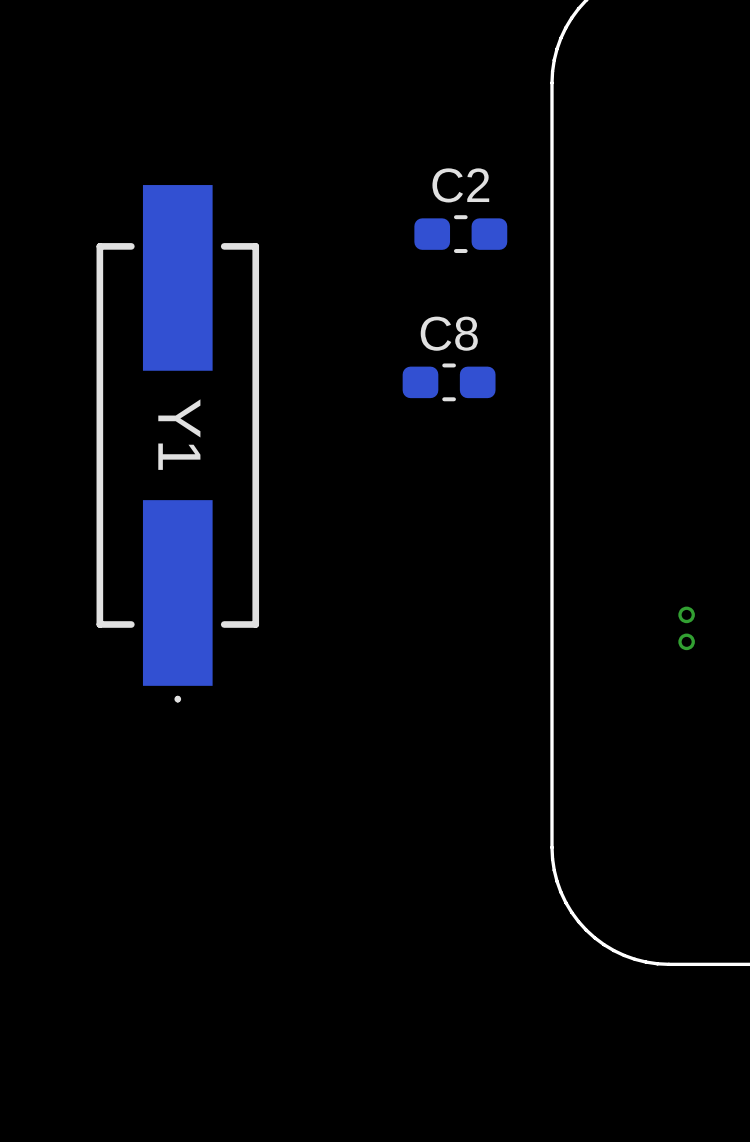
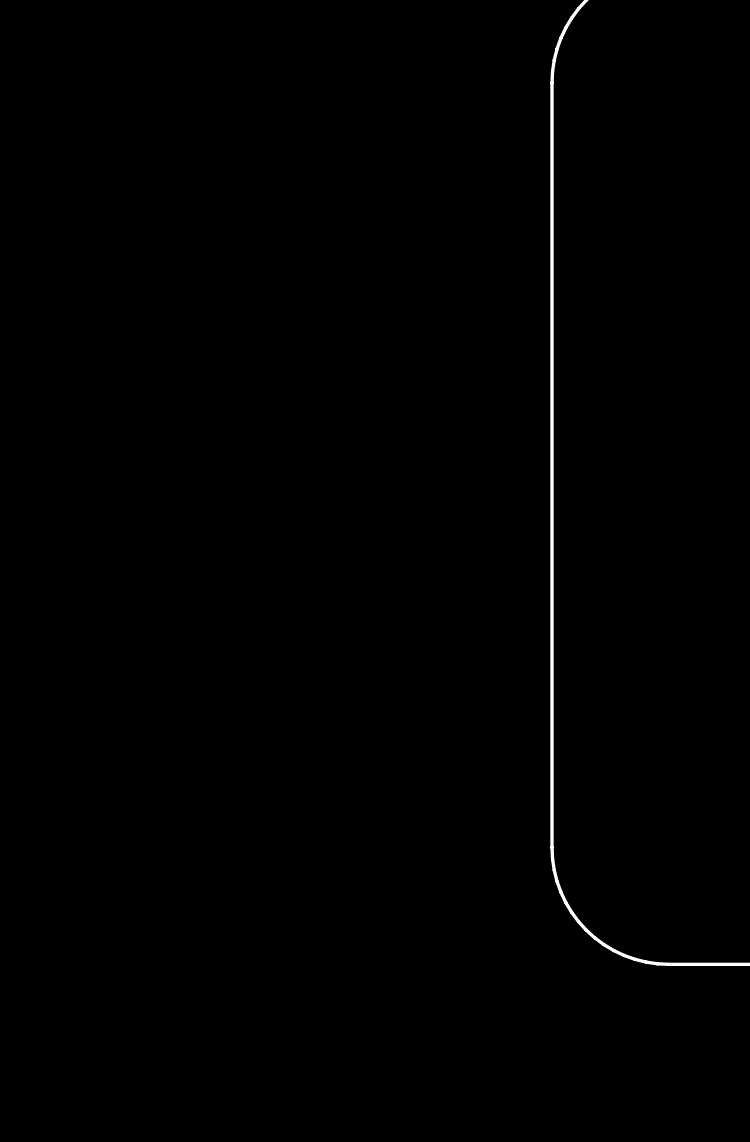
C2: (460, 234) -> none
C8: (449, 382) -> none
Y1: (177, 443) -> none
via: (686, 614) -> none
via: (686, 641) -> none

